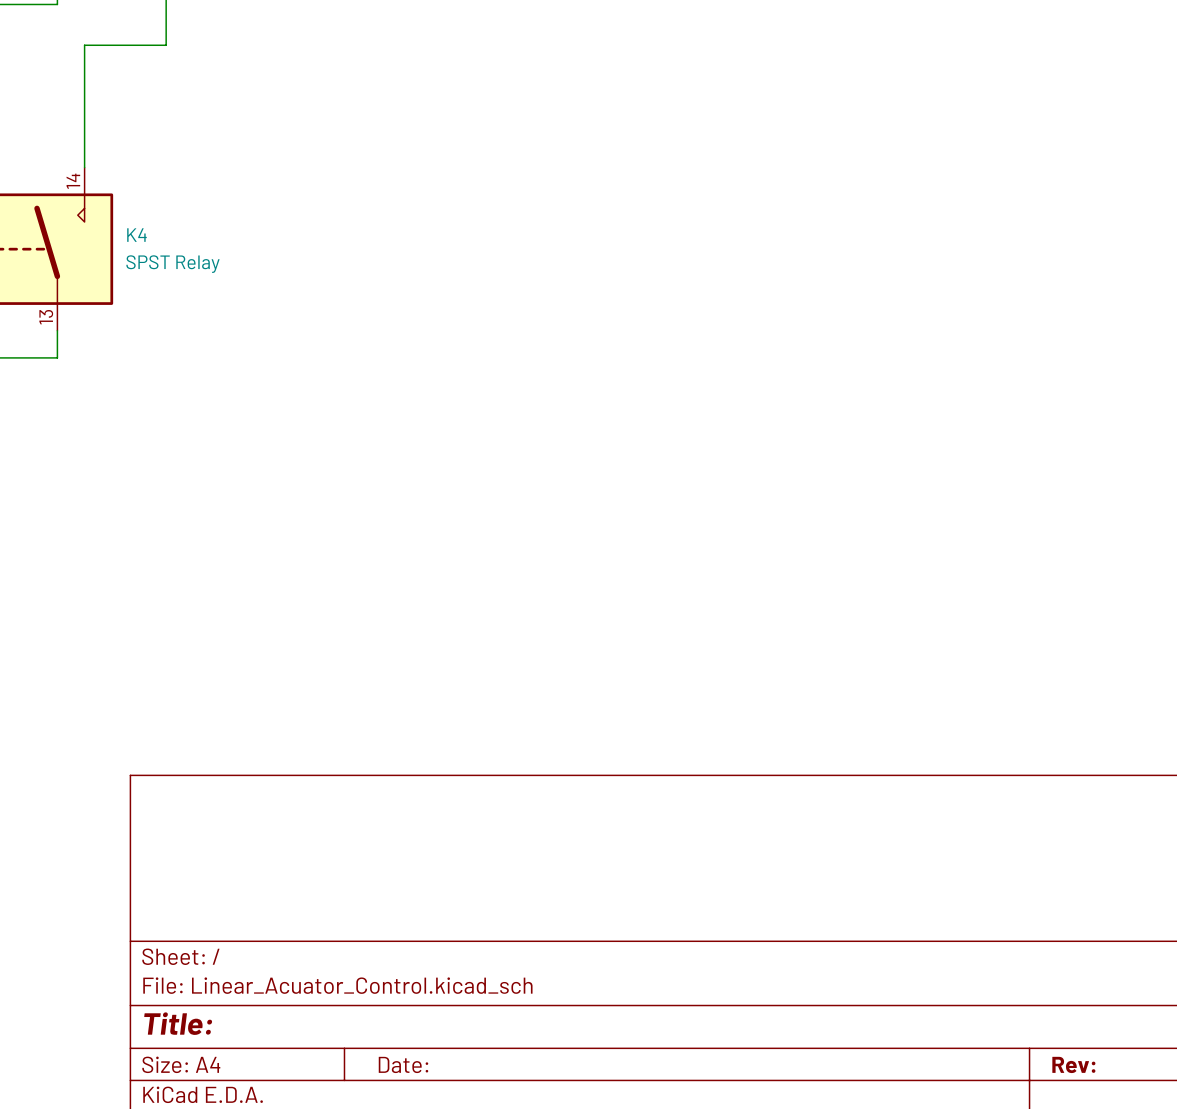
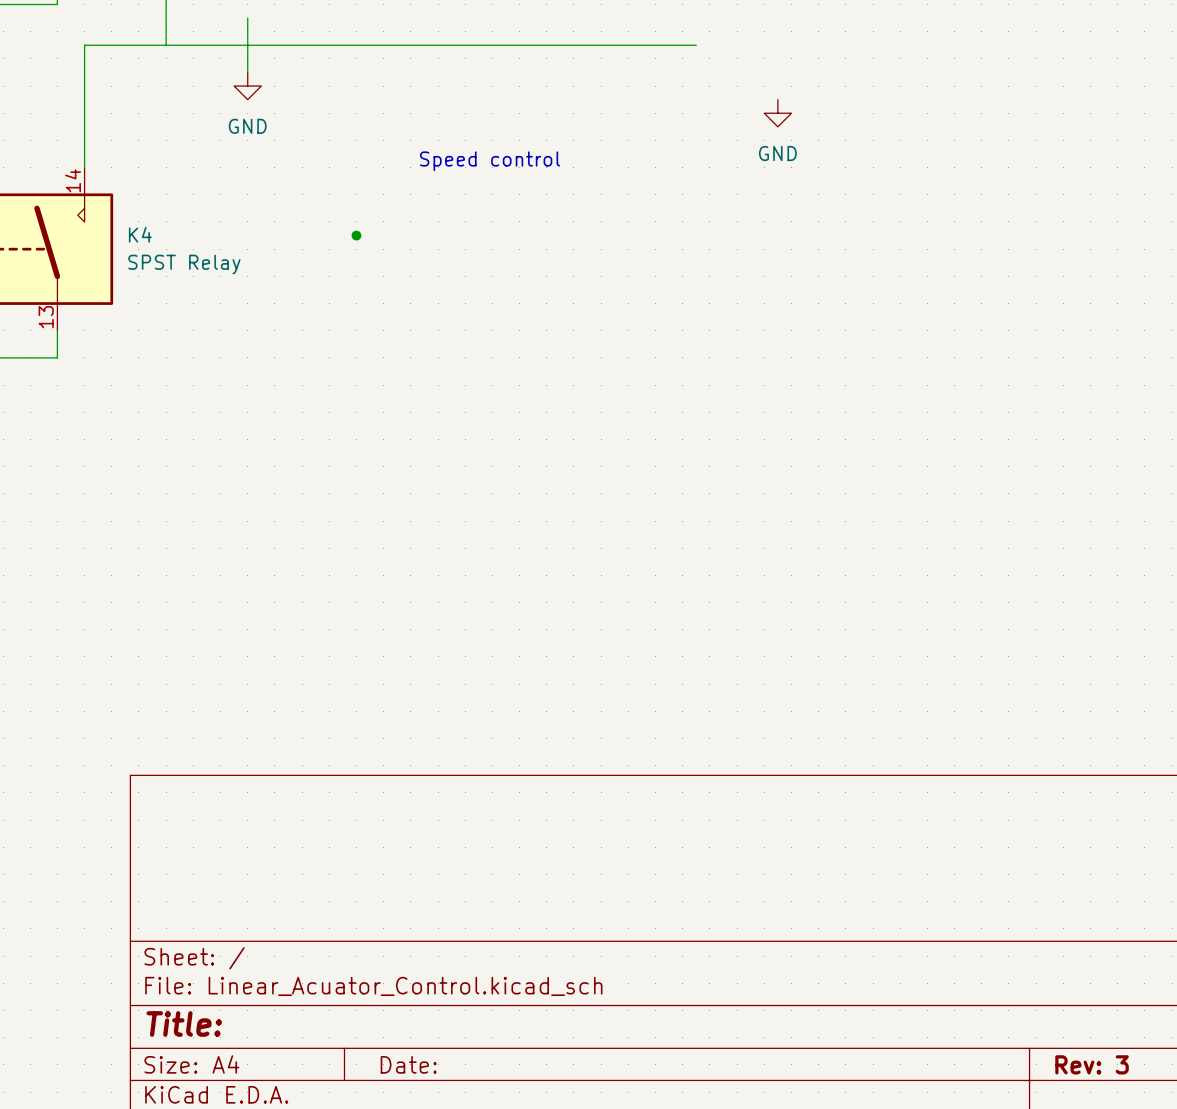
wire: none -> (247, 18) (247, 72)
wire: none -> (166, 45) (696, 45)
power symbol: none -> GND (247, 86)
power symbol: none -> GND (777, 113)
text: none -> Speed control (490, 161)
junction: none -> (356, 235)
title block: Rev: (1073, 1064) -> Rev: 3 (1092, 1064)

